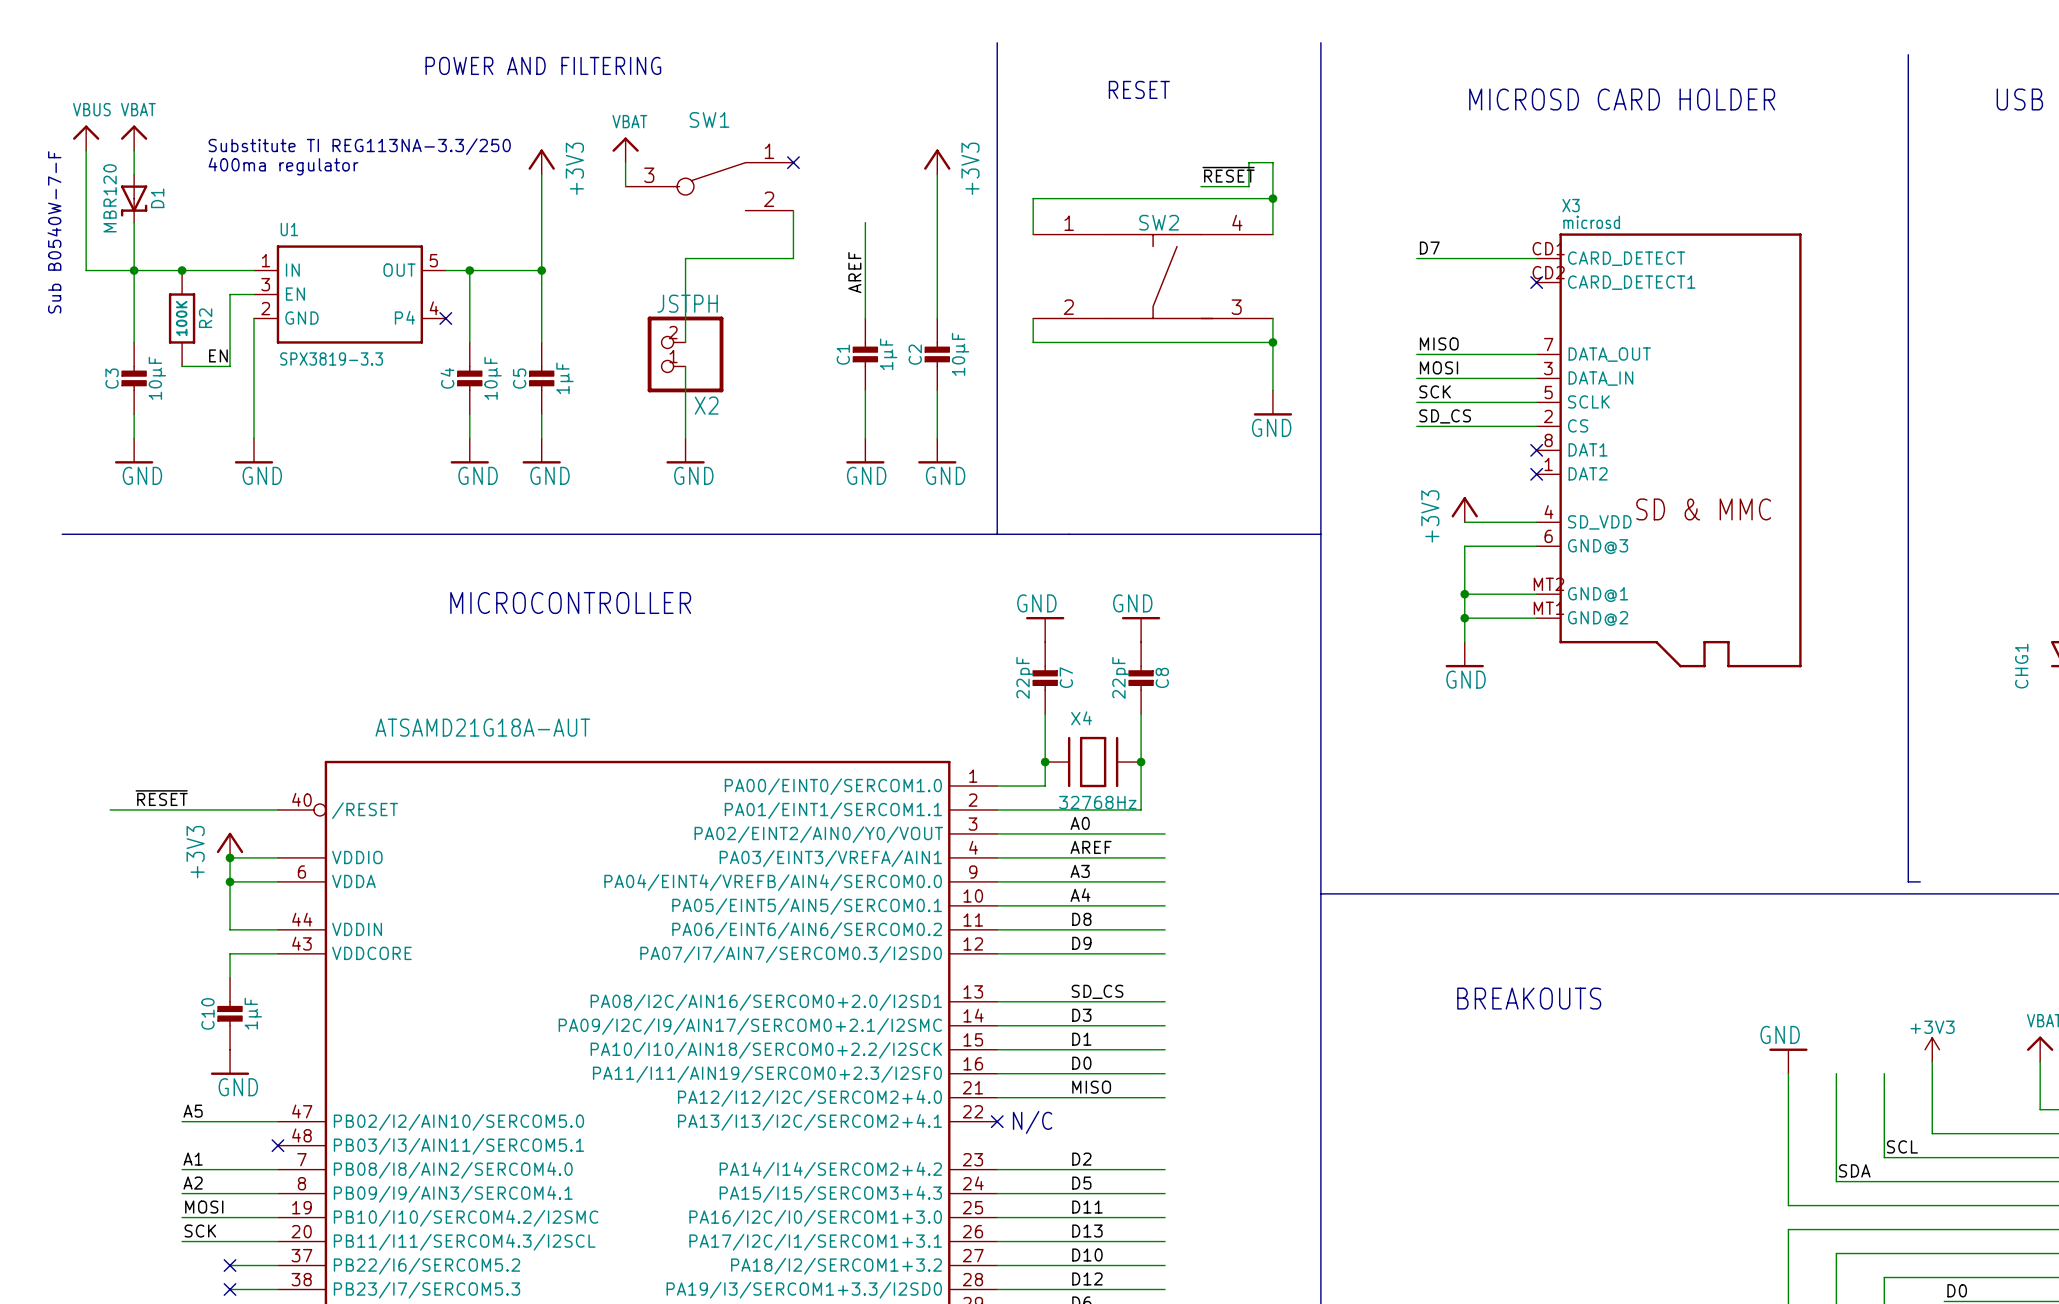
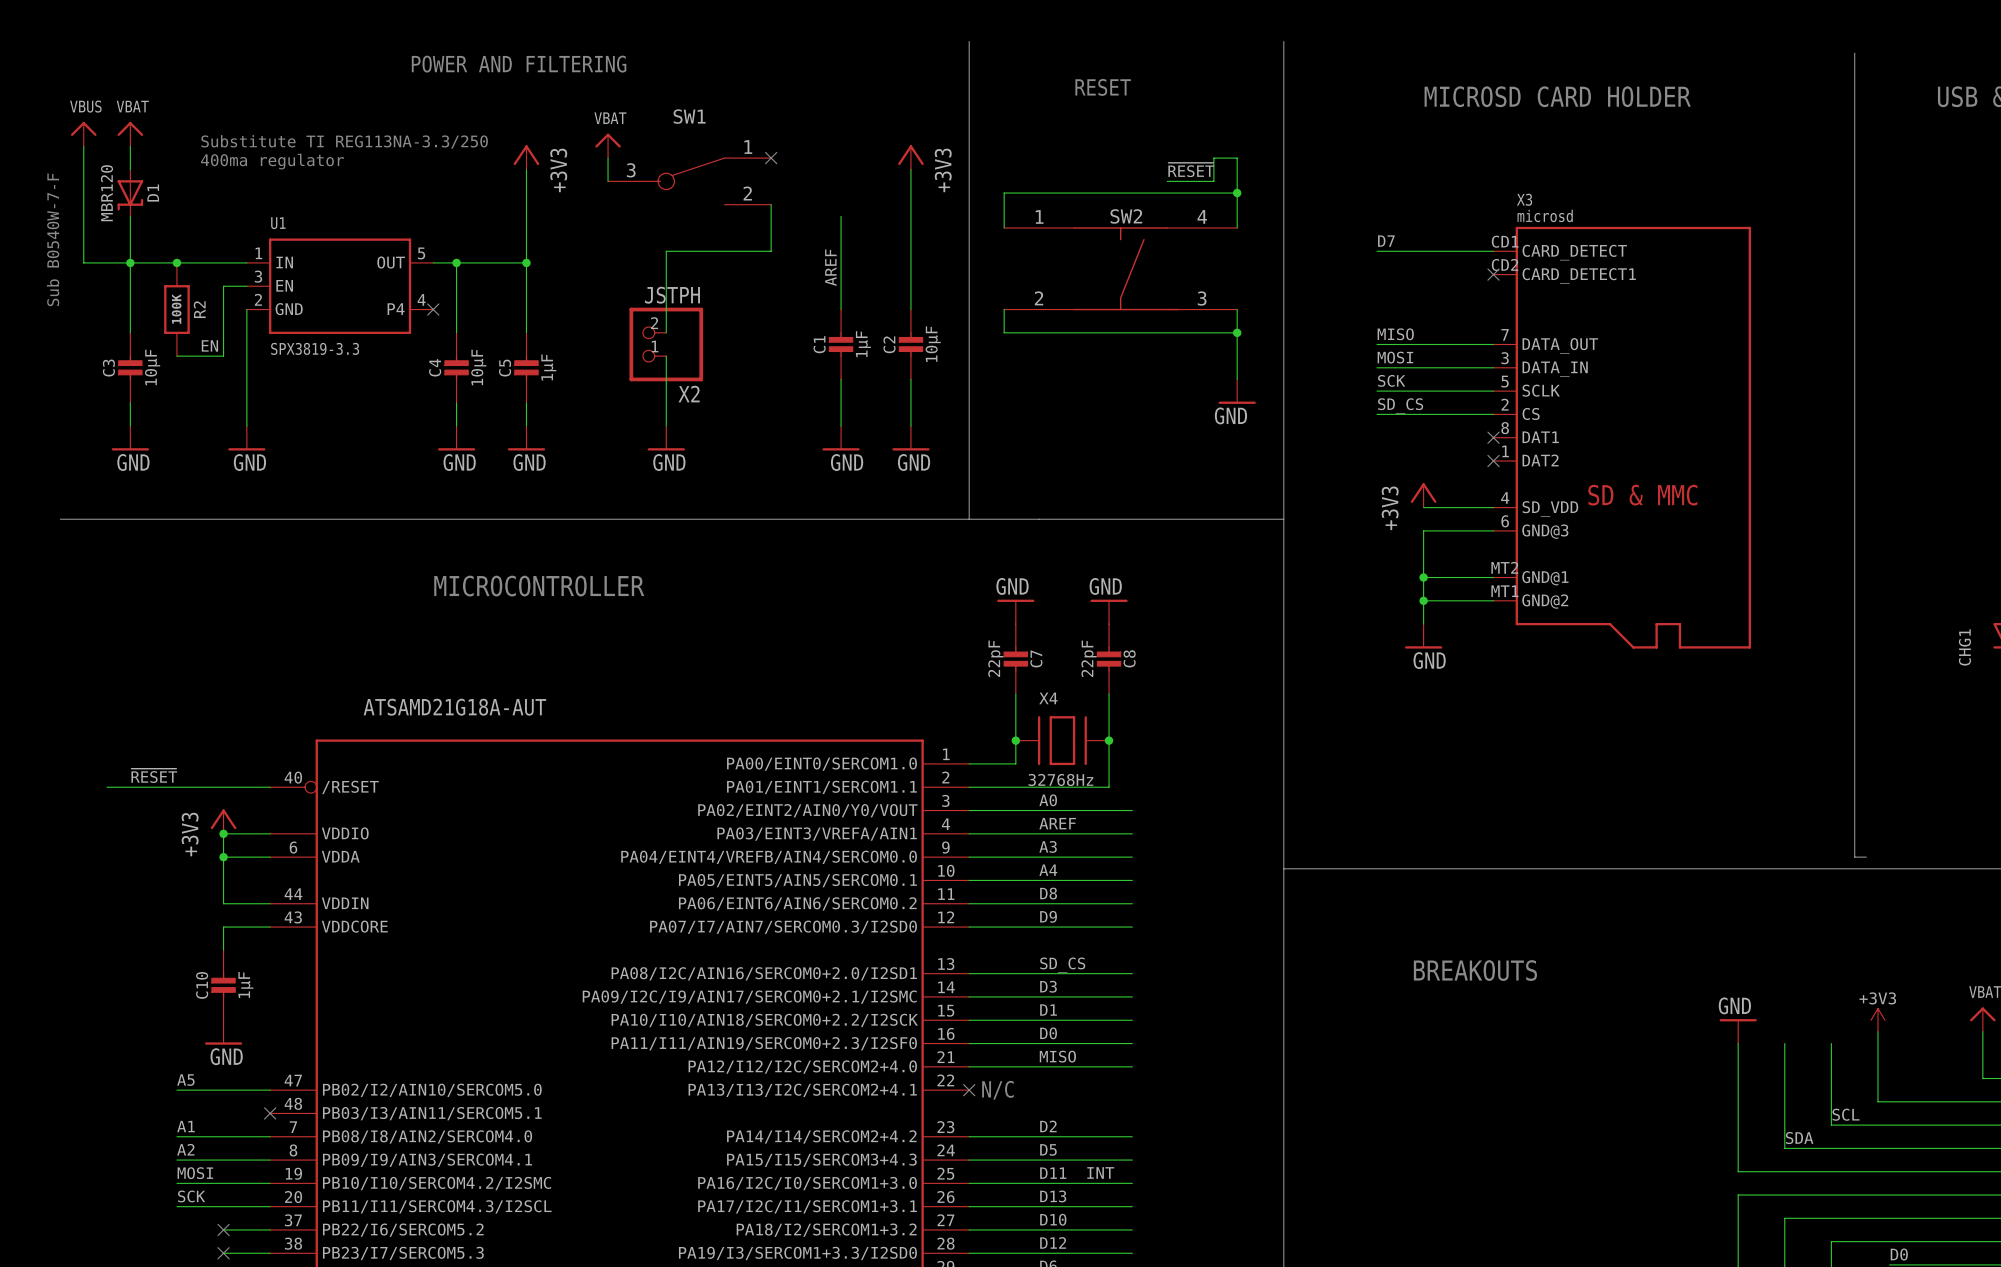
label: none -> INT (1100, 1172)

